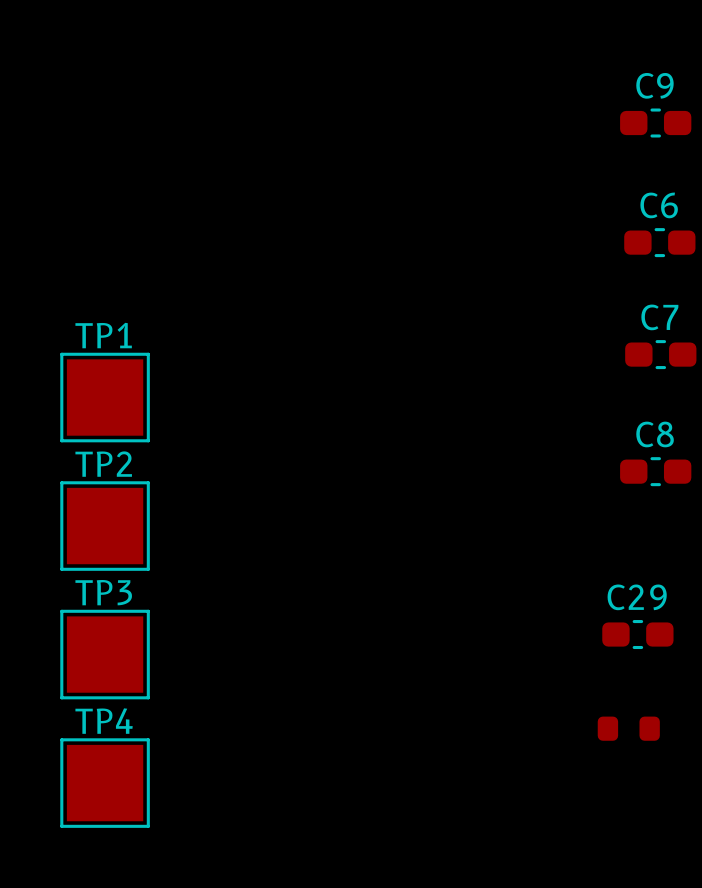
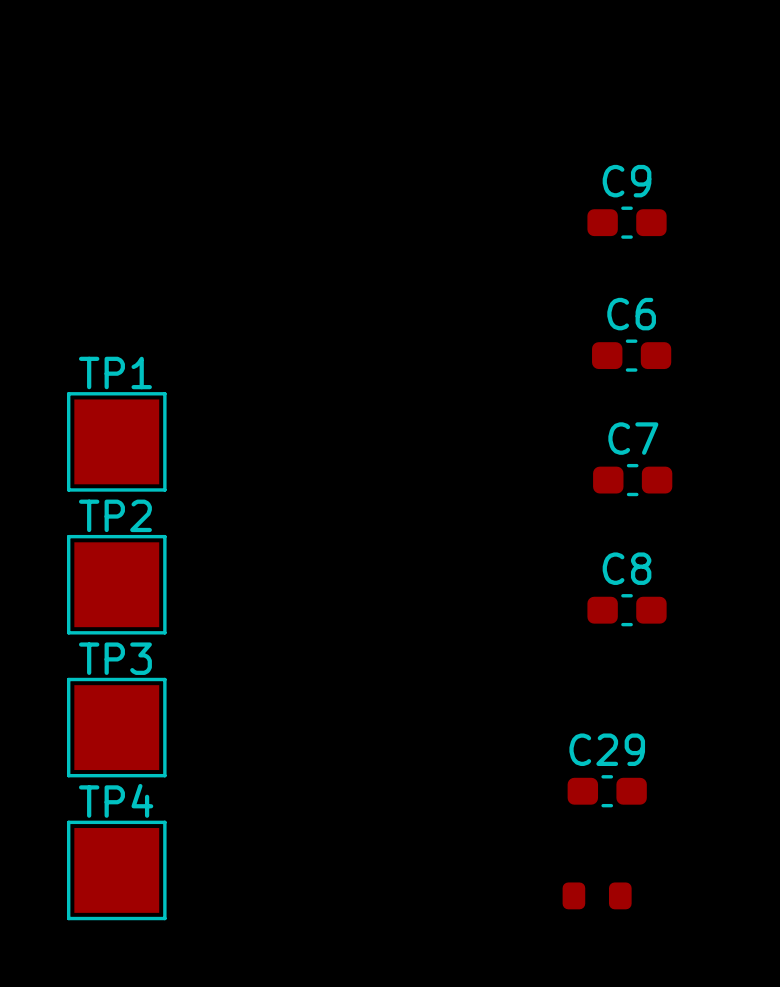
C9 position: (655, 123) -> (627, 222)
C6 position: (659, 242) -> (631, 355)
C7 position: (660, 354) -> (632, 480)
C8 position: (655, 471) -> (627, 610)
C29 position: (637, 634) -> (607, 791)
part position: (628, 728) -> (597, 895)

